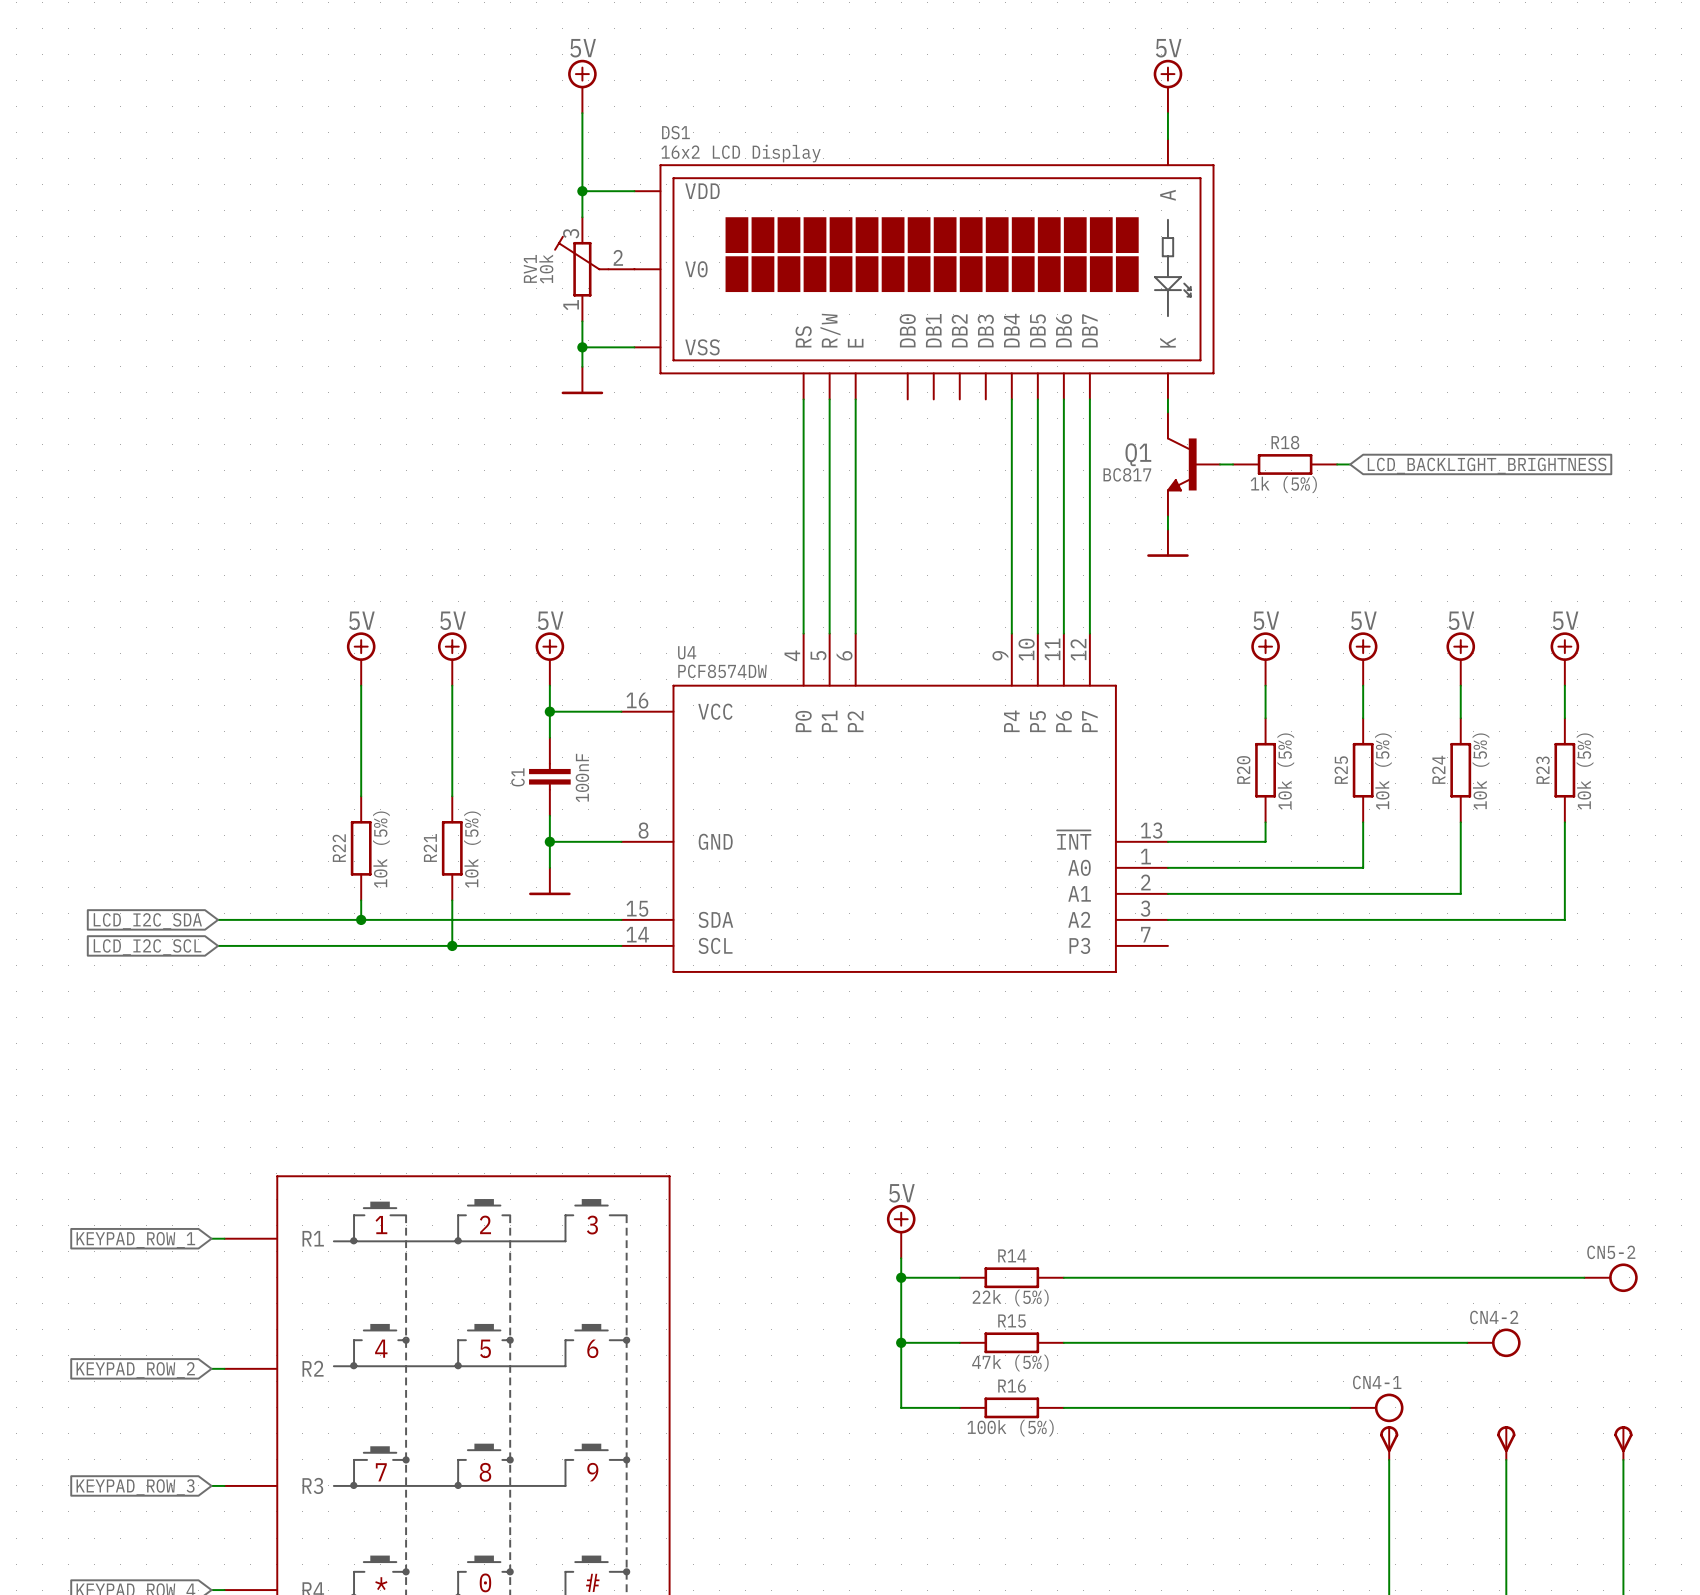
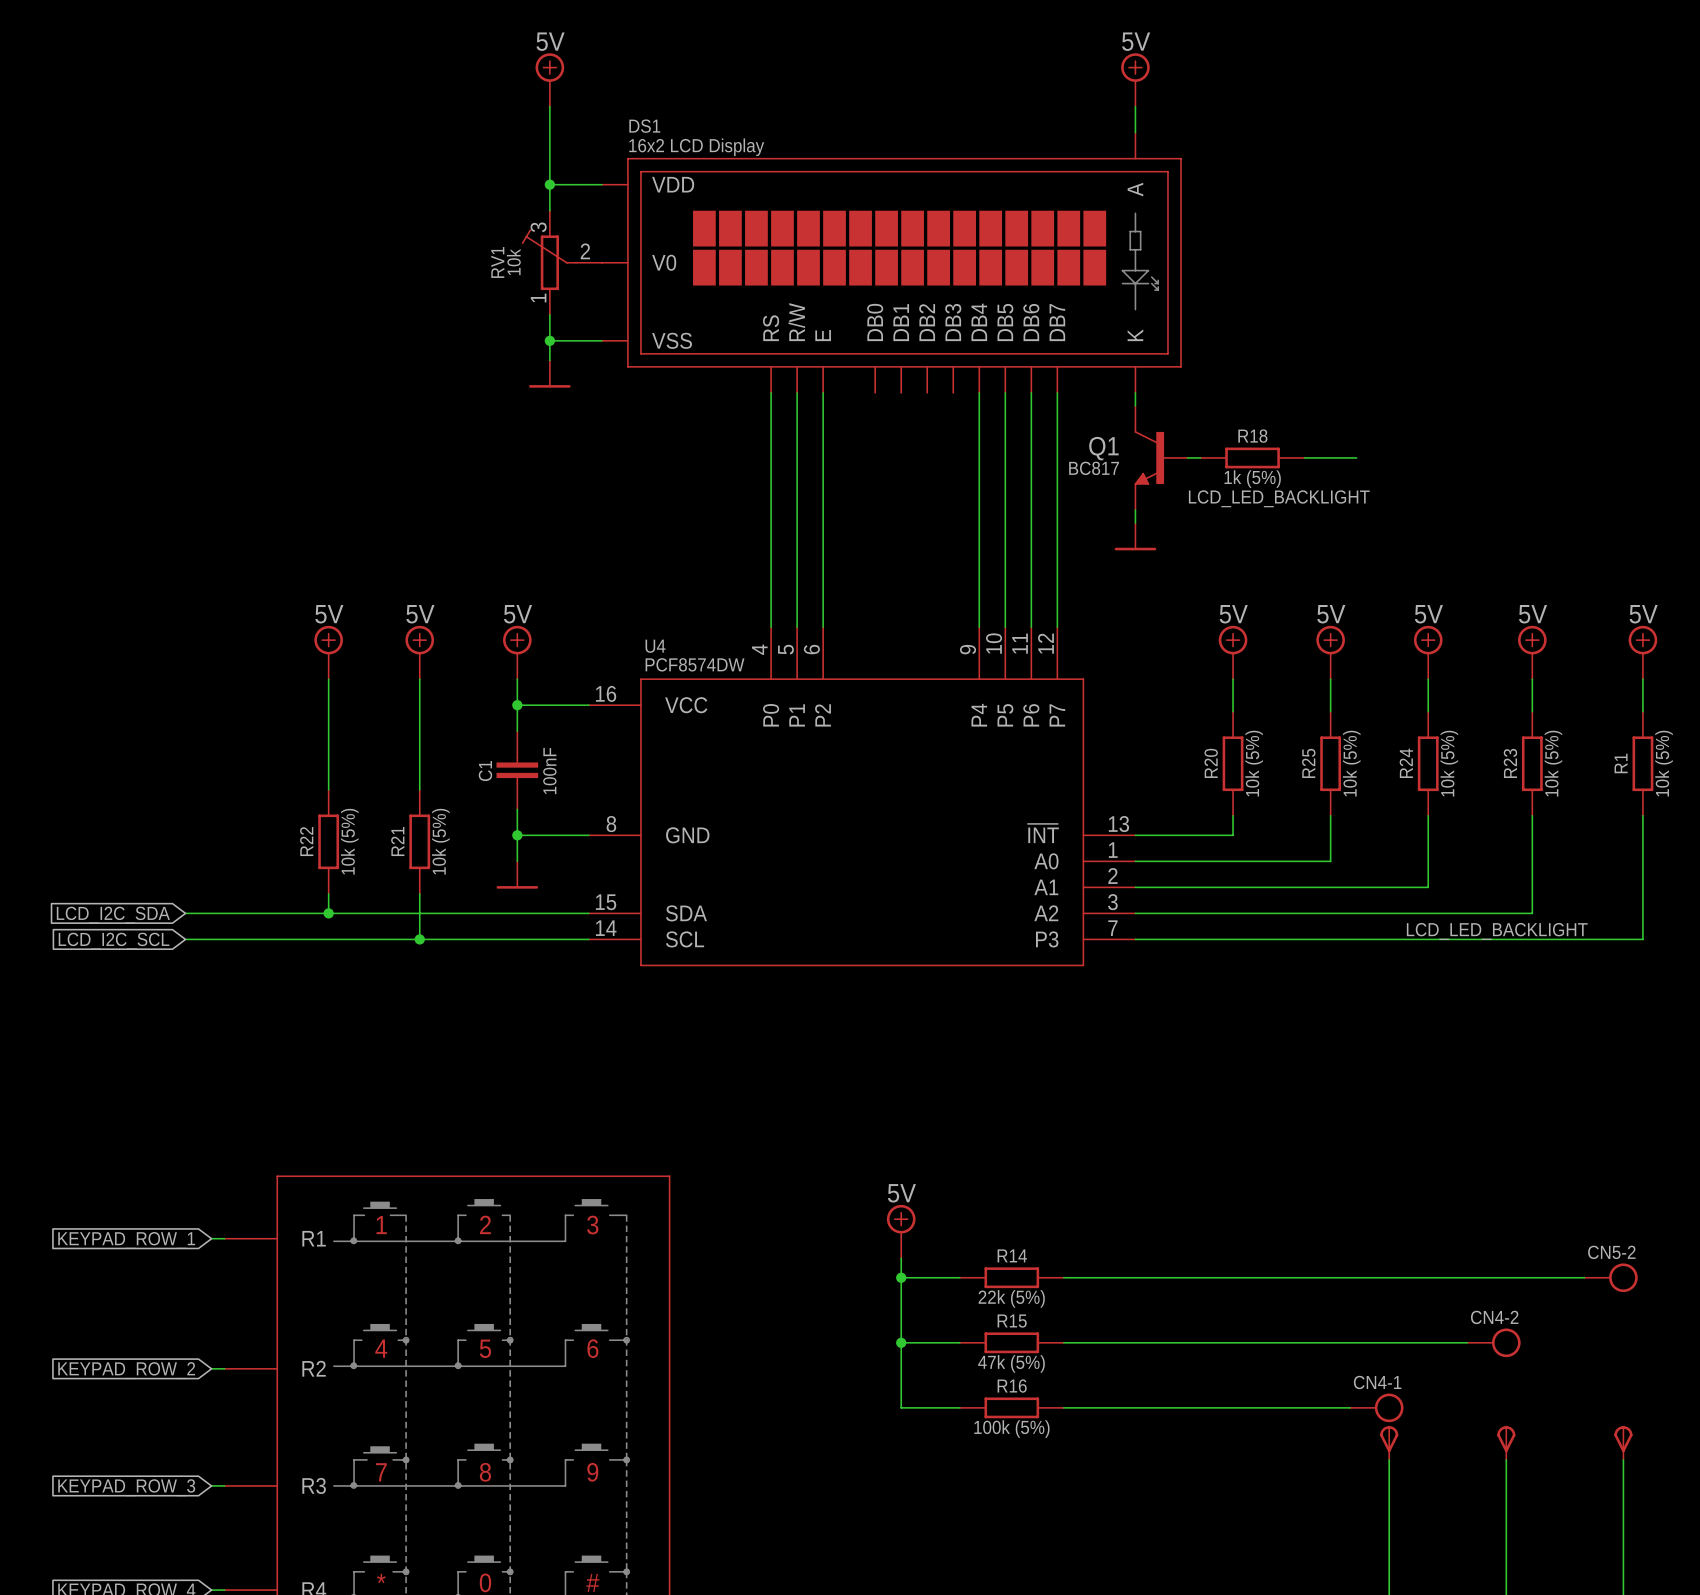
power symbol position: 5V (582, 86) -> 5V (549, 79)
power symbol position: 5V (1167, 86) -> 5V (1135, 79)
wire: (582, 113) (582, 217) -> (549, 106) (549, 210)
wire: (1167, 113) (1167, 139) -> (1135, 106) (1135, 132)
wire: (582, 191) (634, 191) -> (549, 184) (601, 184)
junction position: (582, 191) -> (549, 184)
RV1 position: (594, 269) -> (561, 262)
DS1 position: (924, 269) -> (891, 262)
wire: (582, 321) (582, 366) -> (549, 314) (549, 360)
wire: (582, 347) (634, 347) -> (549, 340) (601, 340)
junction position: (582, 347) -> (549, 340)
power symbol position: (582, 380) -> (549, 374)
wire: (803, 399) (803, 633) -> (771, 392) (771, 627)
wire: (829, 399) (829, 633) -> (797, 392) (797, 627)
wire: (855, 399) (855, 633) -> (823, 392) (823, 627)
wire: (1011, 399) (1011, 633) -> (979, 392) (979, 627)
wire: (1037, 399) (1037, 633) -> (1005, 392) (1005, 627)
wire: (1063, 399) (1063, 633) -> (1031, 392) (1031, 627)
wire: (1089, 399) (1089, 633) -> (1057, 392) (1057, 627)
wire: (1167, 399) (1167, 412) -> (1135, 392) (1135, 405)
wire: none -> (1304, 457) (1356, 457)
Q1 position: (1193, 464) -> (1161, 457)
R18 position: (1285, 464) -> (1252, 457)
wire: (1337, 464) (1350, 464) -> none
global label: LCD_BACKLIGHT_BRIGHTNESS (1487, 465) -> none
label: none -> LCD_LED_BACKLIGHT (1279, 498)
wire: (1167, 516) (1167, 529) -> (1135, 510) (1135, 523)
power symbol position: (1167, 543) -> (1135, 536)
power symbol: none -> 5V (328, 652)
power symbol: none -> 5V (419, 652)
power symbol: none -> 5V (517, 652)
power symbol: none -> 5V (1233, 652)
power symbol: none -> 5V (1330, 652)
power symbol: none -> 5V (1428, 652)
power symbol: none -> 5V (1642, 652)
power symbol: 5V (361, 659) -> none
power symbol: 5V (452, 659) -> none
power symbol: 5V (549, 659) -> none
power symbol: 5V (1265, 659) -> none
power symbol: 5V (1363, 659) -> none
power symbol: 5V (1460, 659) -> none
power symbol position: 5V (1564, 659) -> 5V (1532, 652)
wire: none -> (1642, 679) (1642, 711)
wire: (361, 685) (361, 796) -> (328, 679) (328, 789)
wire: (452, 685) (452, 796) -> (419, 679) (419, 789)
wire: (549, 685) (549, 737) -> (517, 679) (517, 731)
wire: (1265, 685) (1265, 718) -> (1233, 679) (1233, 711)
wire: (1363, 685) (1363, 718) -> (1330, 679) (1330, 711)
wire: (1460, 685) (1460, 718) -> (1428, 679) (1428, 711)
wire: (1564, 685) (1564, 718) -> (1532, 679) (1532, 711)
wire: (549, 711) (621, 711) -> (517, 705) (588, 705)
junction position: (549, 711) -> (517, 705)
R1: none -> 10k (5%) (1642, 763)
R20 position: (1265, 770) -> (1233, 763)
R25 position: (1363, 770) -> (1330, 763)
R24 position: (1460, 770) -> (1428, 763)
R23 position: (1564, 770) -> (1532, 763)
C1 position: (549, 776) -> (517, 770)
U4 position: (894, 803) -> (862, 796)
wire: (549, 815) (549, 867) -> (517, 809) (517, 861)
wire: none -> (1642, 815) (1642, 939) (1135, 939)
wire: (1265, 822) (1265, 841) (1167, 841) -> (1233, 815) (1233, 835) (1135, 835)
wire: (1363, 822) (1363, 867) (1167, 867) -> (1330, 815) (1330, 861) (1135, 861)
wire: (1460, 822) (1460, 893) (1167, 893) -> (1428, 815) (1428, 887) (1135, 887)
wire: (1564, 822) (1564, 919) (1167, 919) -> (1532, 815) (1532, 913) (1135, 913)
wire: (549, 841) (621, 841) -> (517, 835) (588, 835)
junction position: (549, 841) -> (517, 835)
R22 position: (361, 848) -> (328, 841)
R21 position: (452, 848) -> (419, 841)
power symbol position: (549, 881) -> (517, 875)
wire: (361, 900) (361, 919) -> (328, 893) (328, 913)
wire: (452, 900) (452, 945) -> (419, 893) (419, 939)
junction: none -> (328, 913)
wire: (218, 919) (621, 919) -> (185, 913) (588, 913)
junction: (361, 919) -> none
global label position: LCD_I2C_SDA (147, 921) -> LCD_I2C_SDA (113, 915)
label: none -> LCD_LED_BACKLIGHT (1497, 931)
junction: none -> (419, 939)
wire: (218, 945) (621, 945) -> (185, 939) (588, 939)
junction: (452, 945) -> none
global label position: LCD_I2C_SCL (147, 947) -> LCD_I2C_SCL (114, 941)

